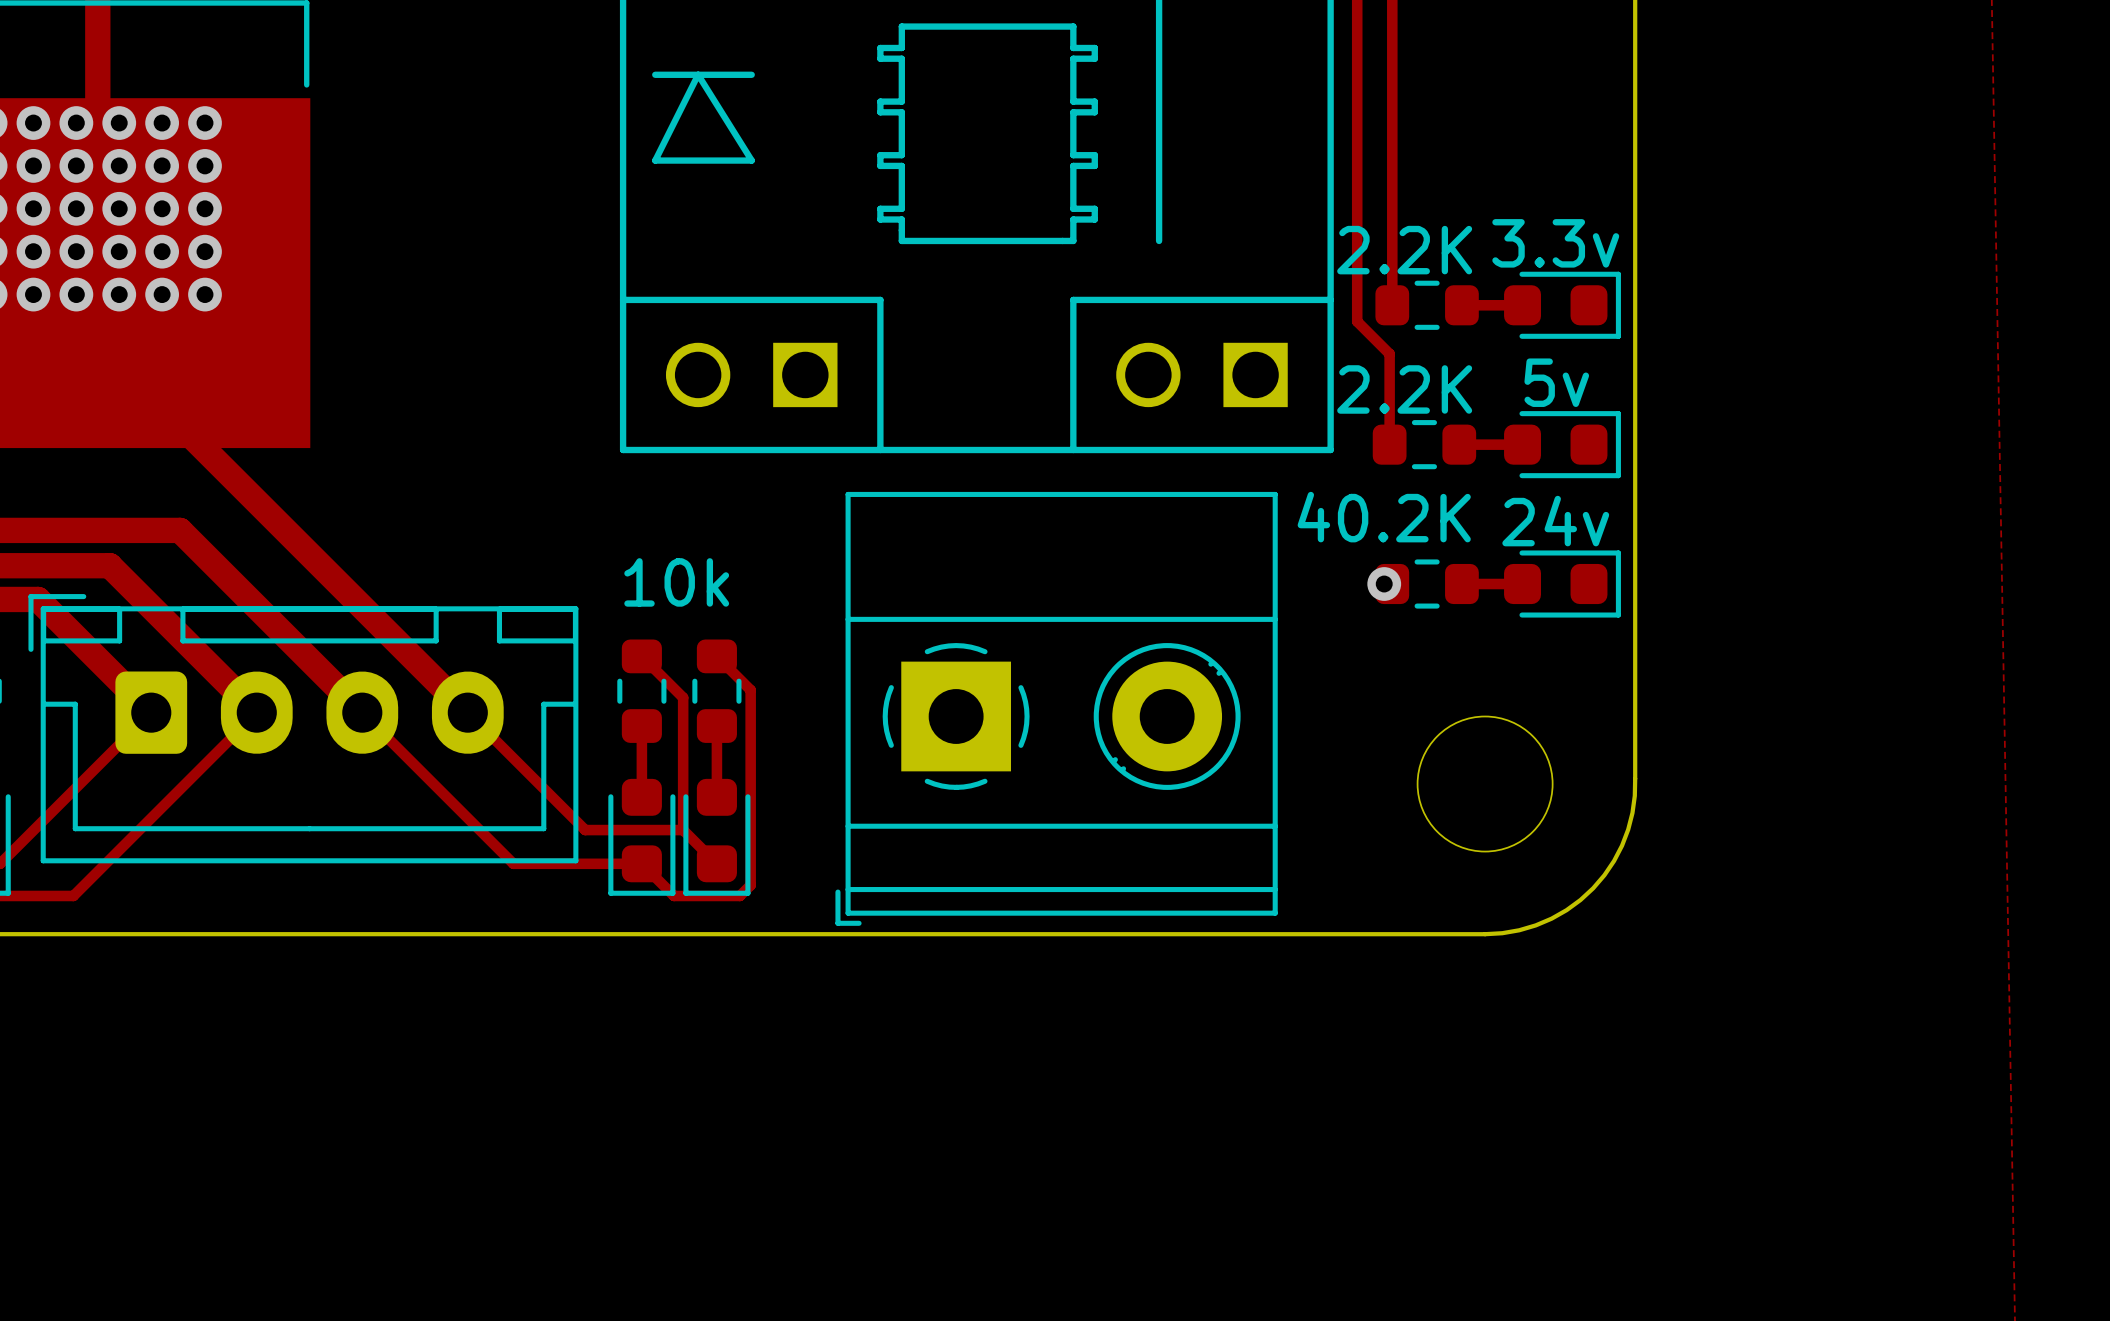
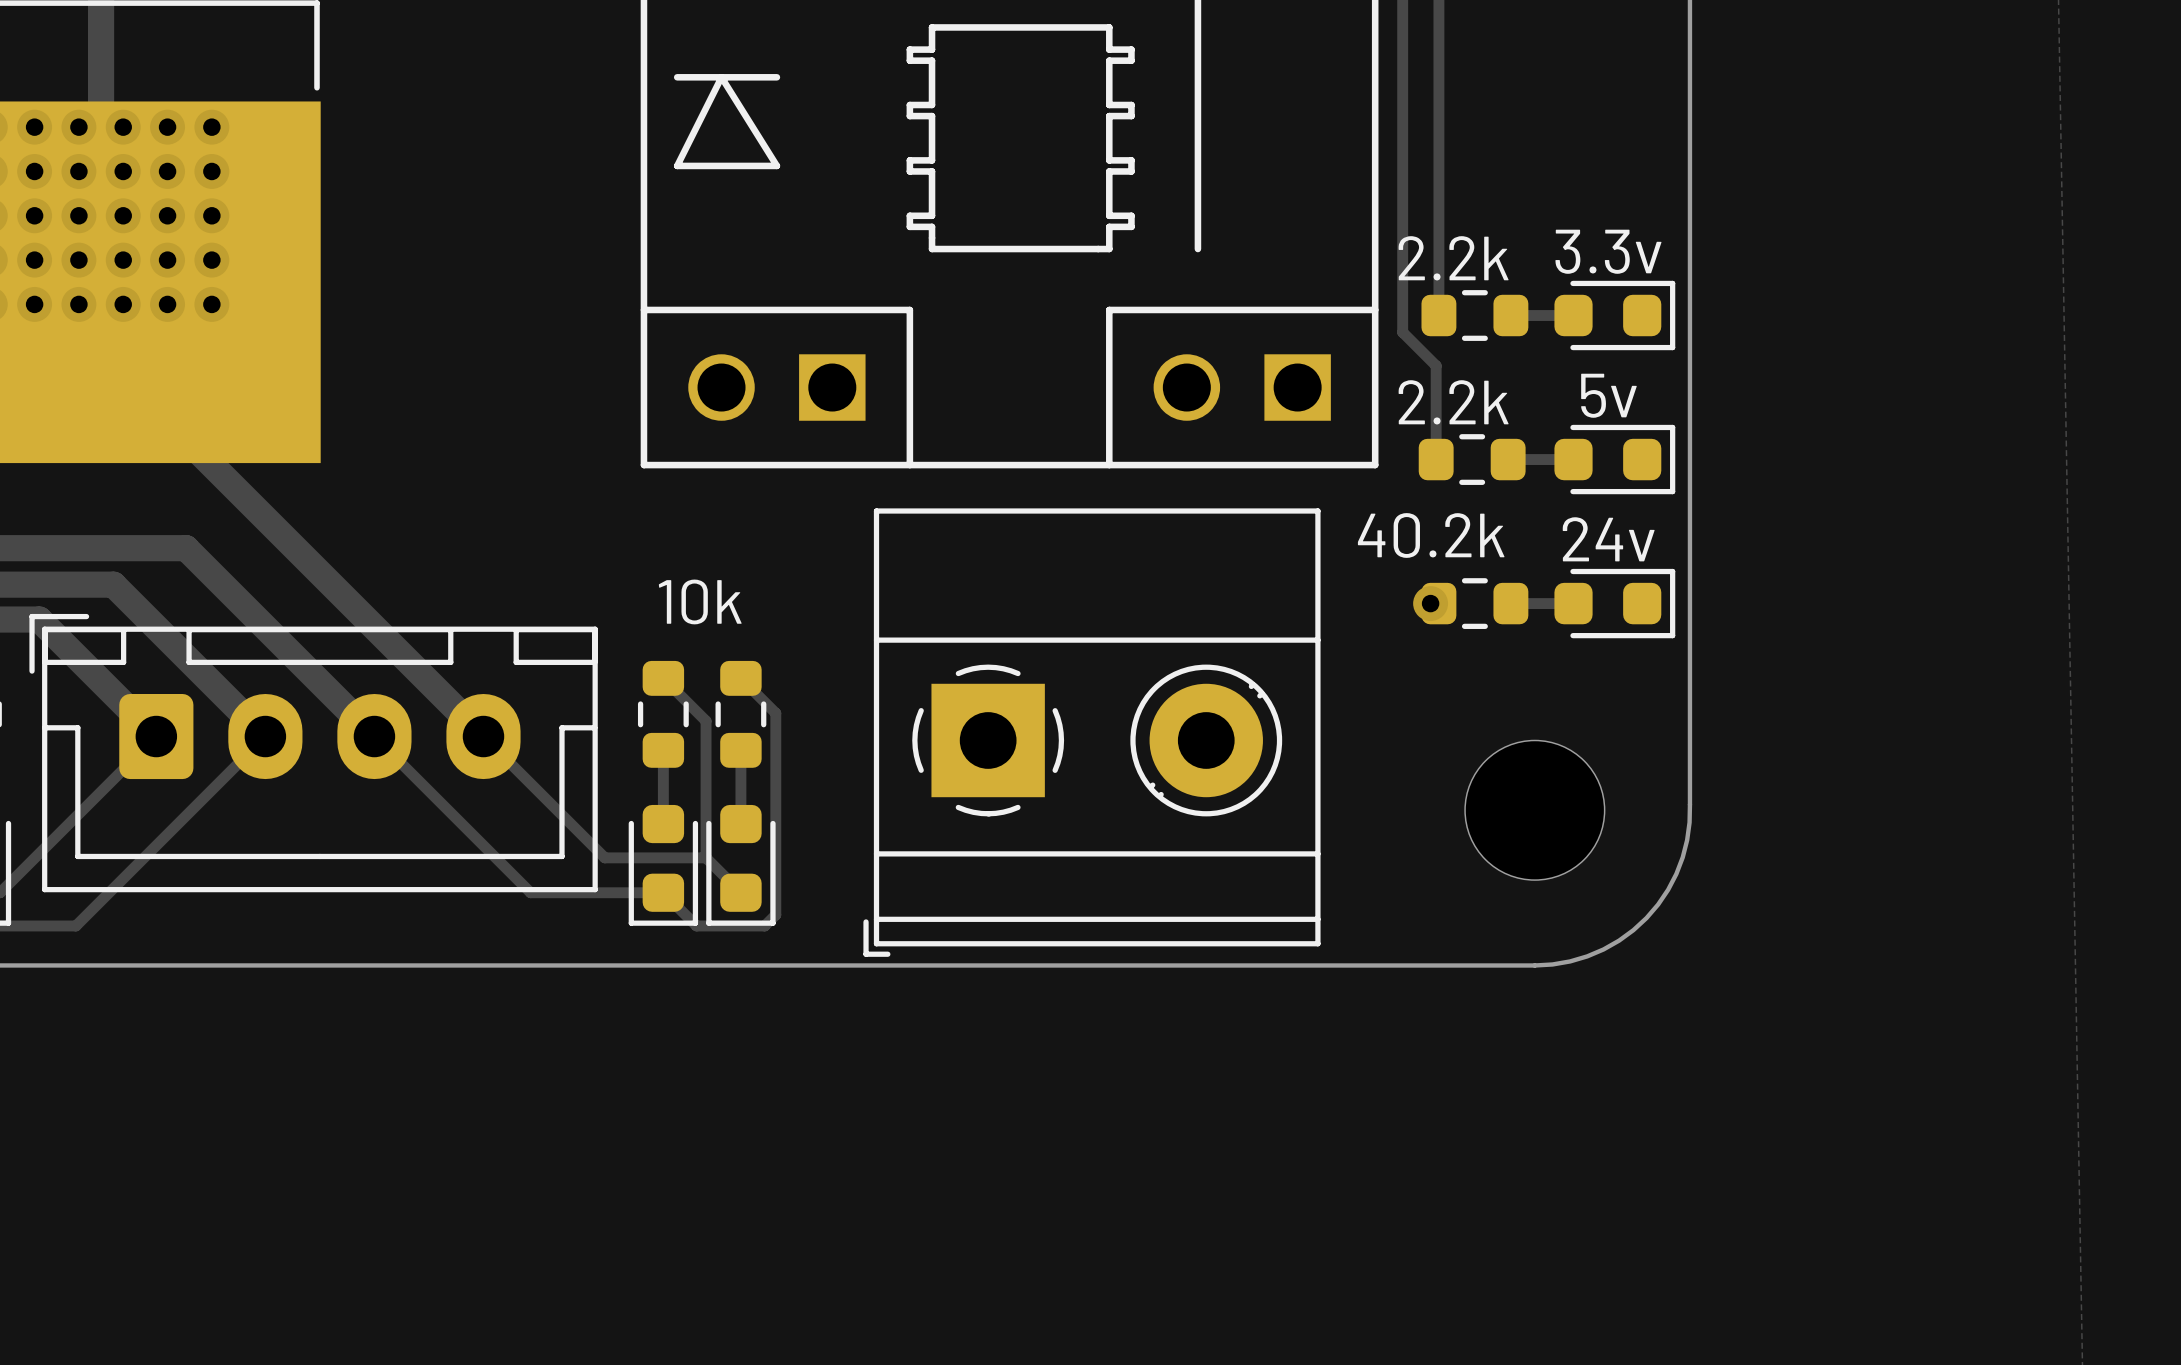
part value: 2.2K (1404, 250) -> 2.2k (1453, 258)
part value: 2.2K (1404, 389) -> 2.2k (1453, 402)
part value: 40.2K (1384, 517) -> 40.2k (1431, 535)

